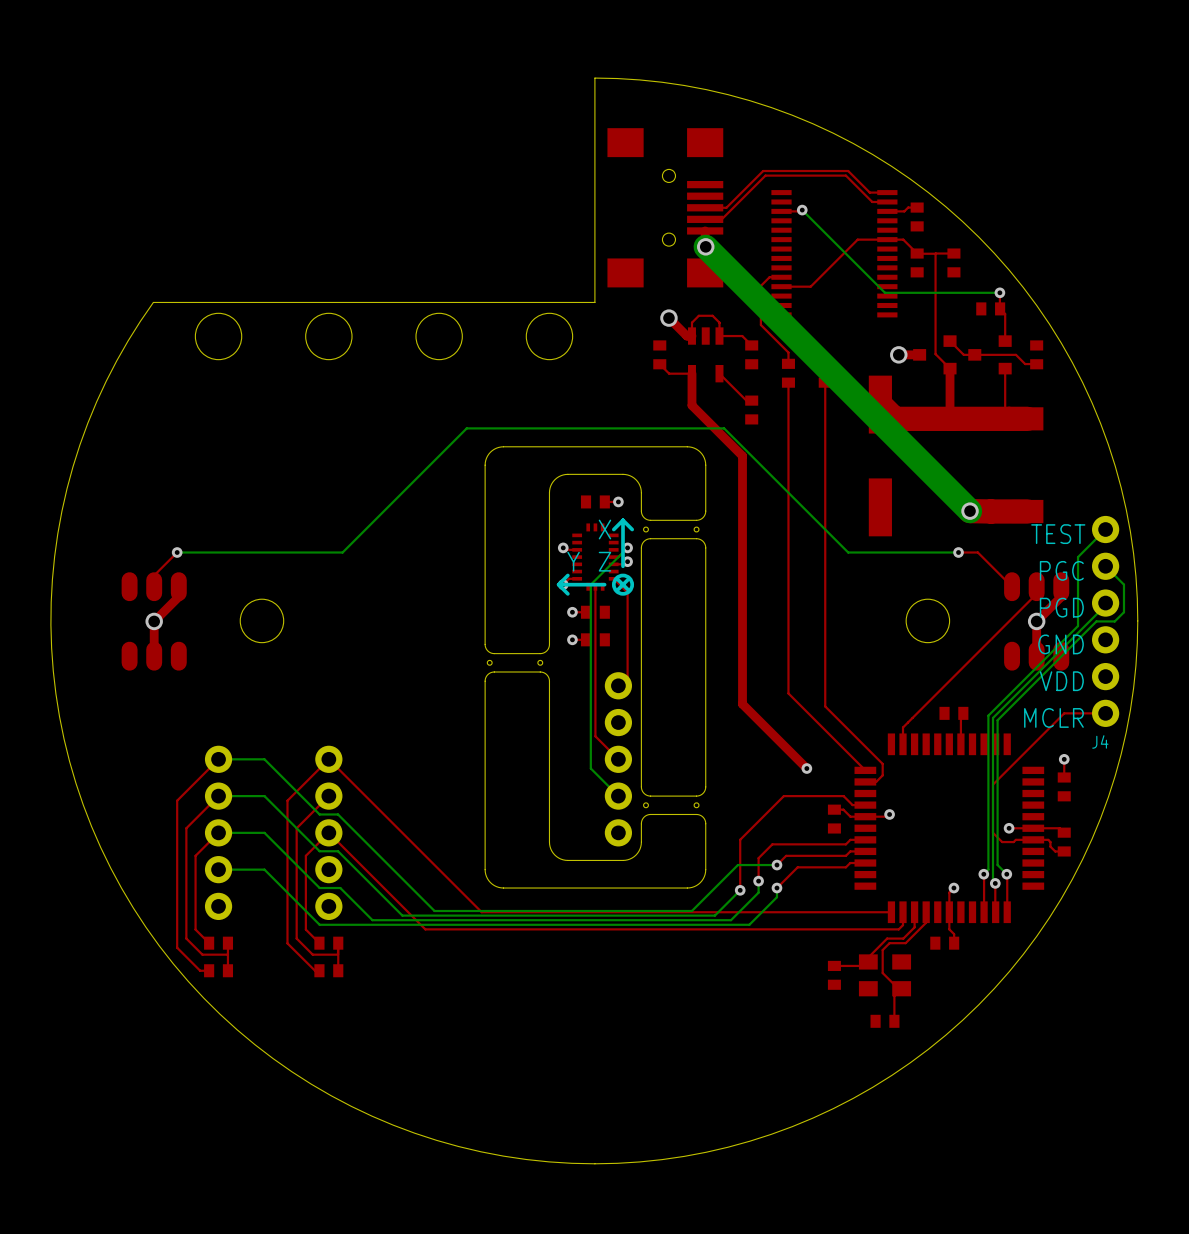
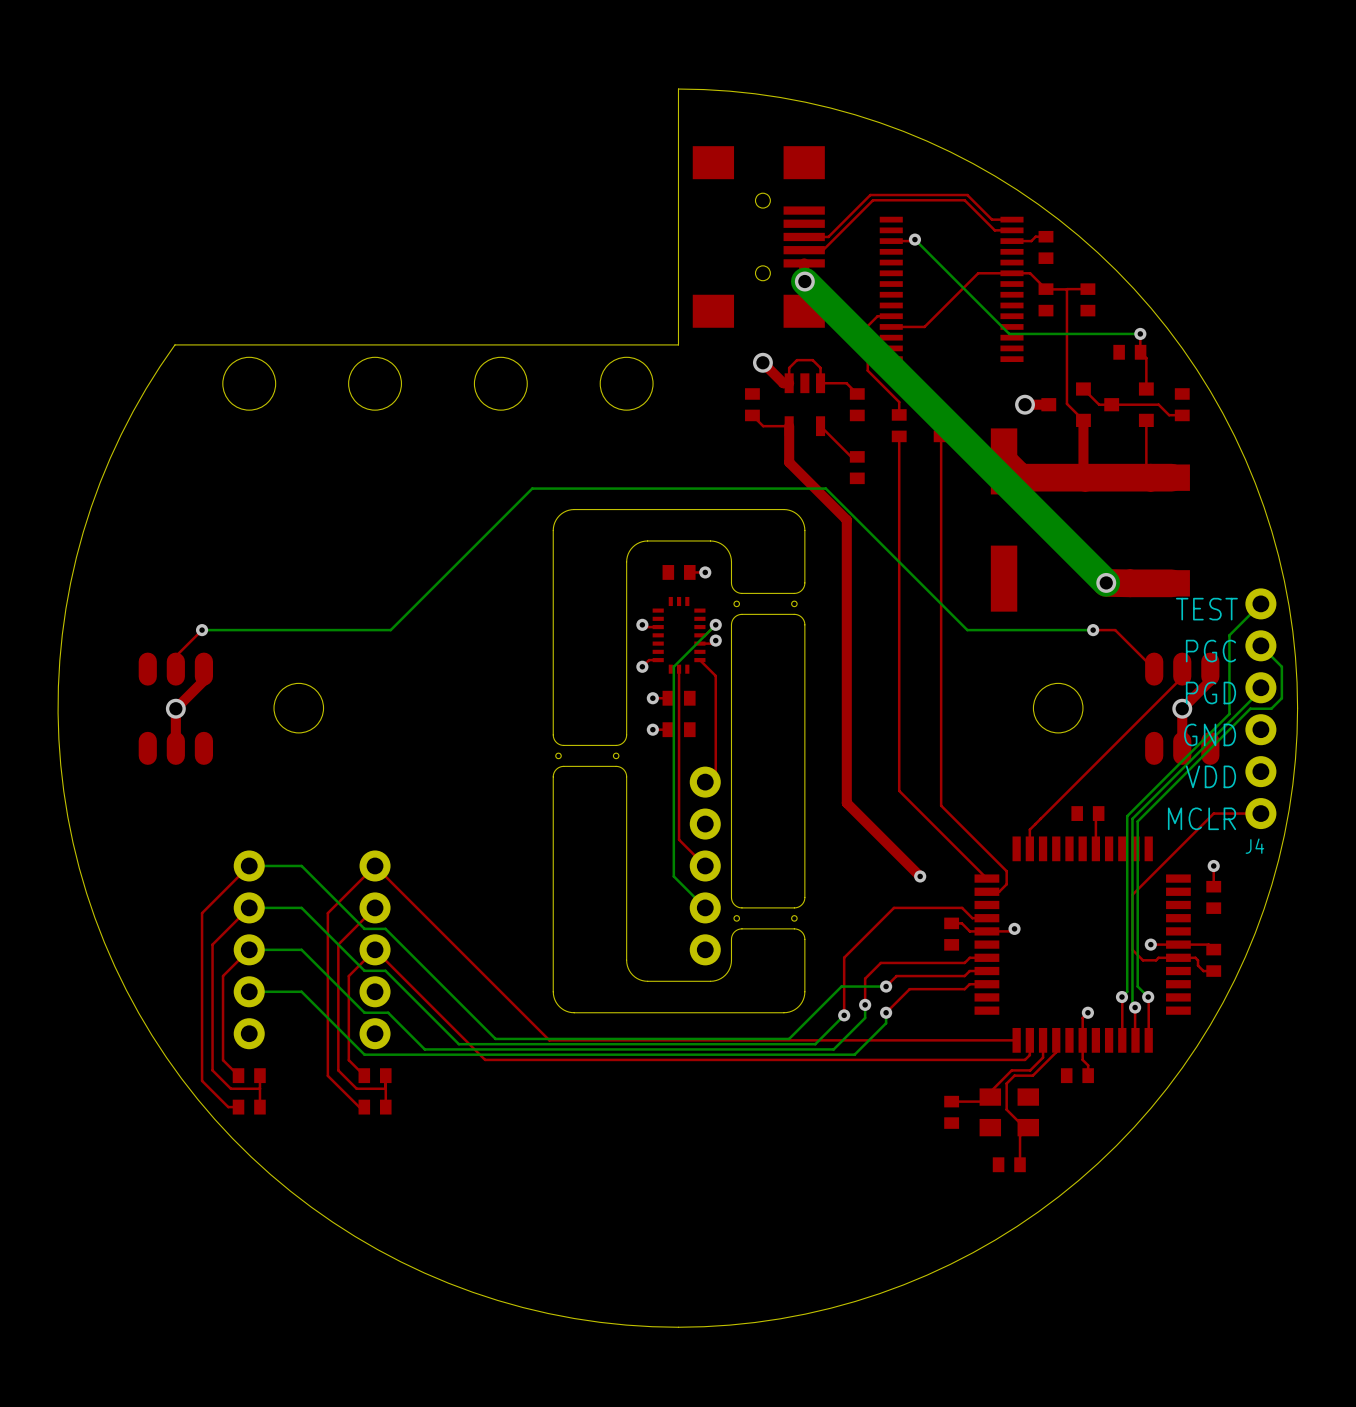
line: (623, 520) (623, 566) -> none
line: (623, 520) (632, 529) -> none
line: (623, 520) (613, 529) -> none
text: X (604, 529) -> none
text: Y (573, 561) -> none
text: Z (604, 561) -> none
drawing: [611, 573, 635, 596] -> none
line: (567, 575) (558, 584) -> none
line: (618, 580) (627, 589) -> none
line: (627, 580) (618, 589) -> none
line: (558, 584) (567, 593) -> none
line: (604, 584) (558, 584) -> none

